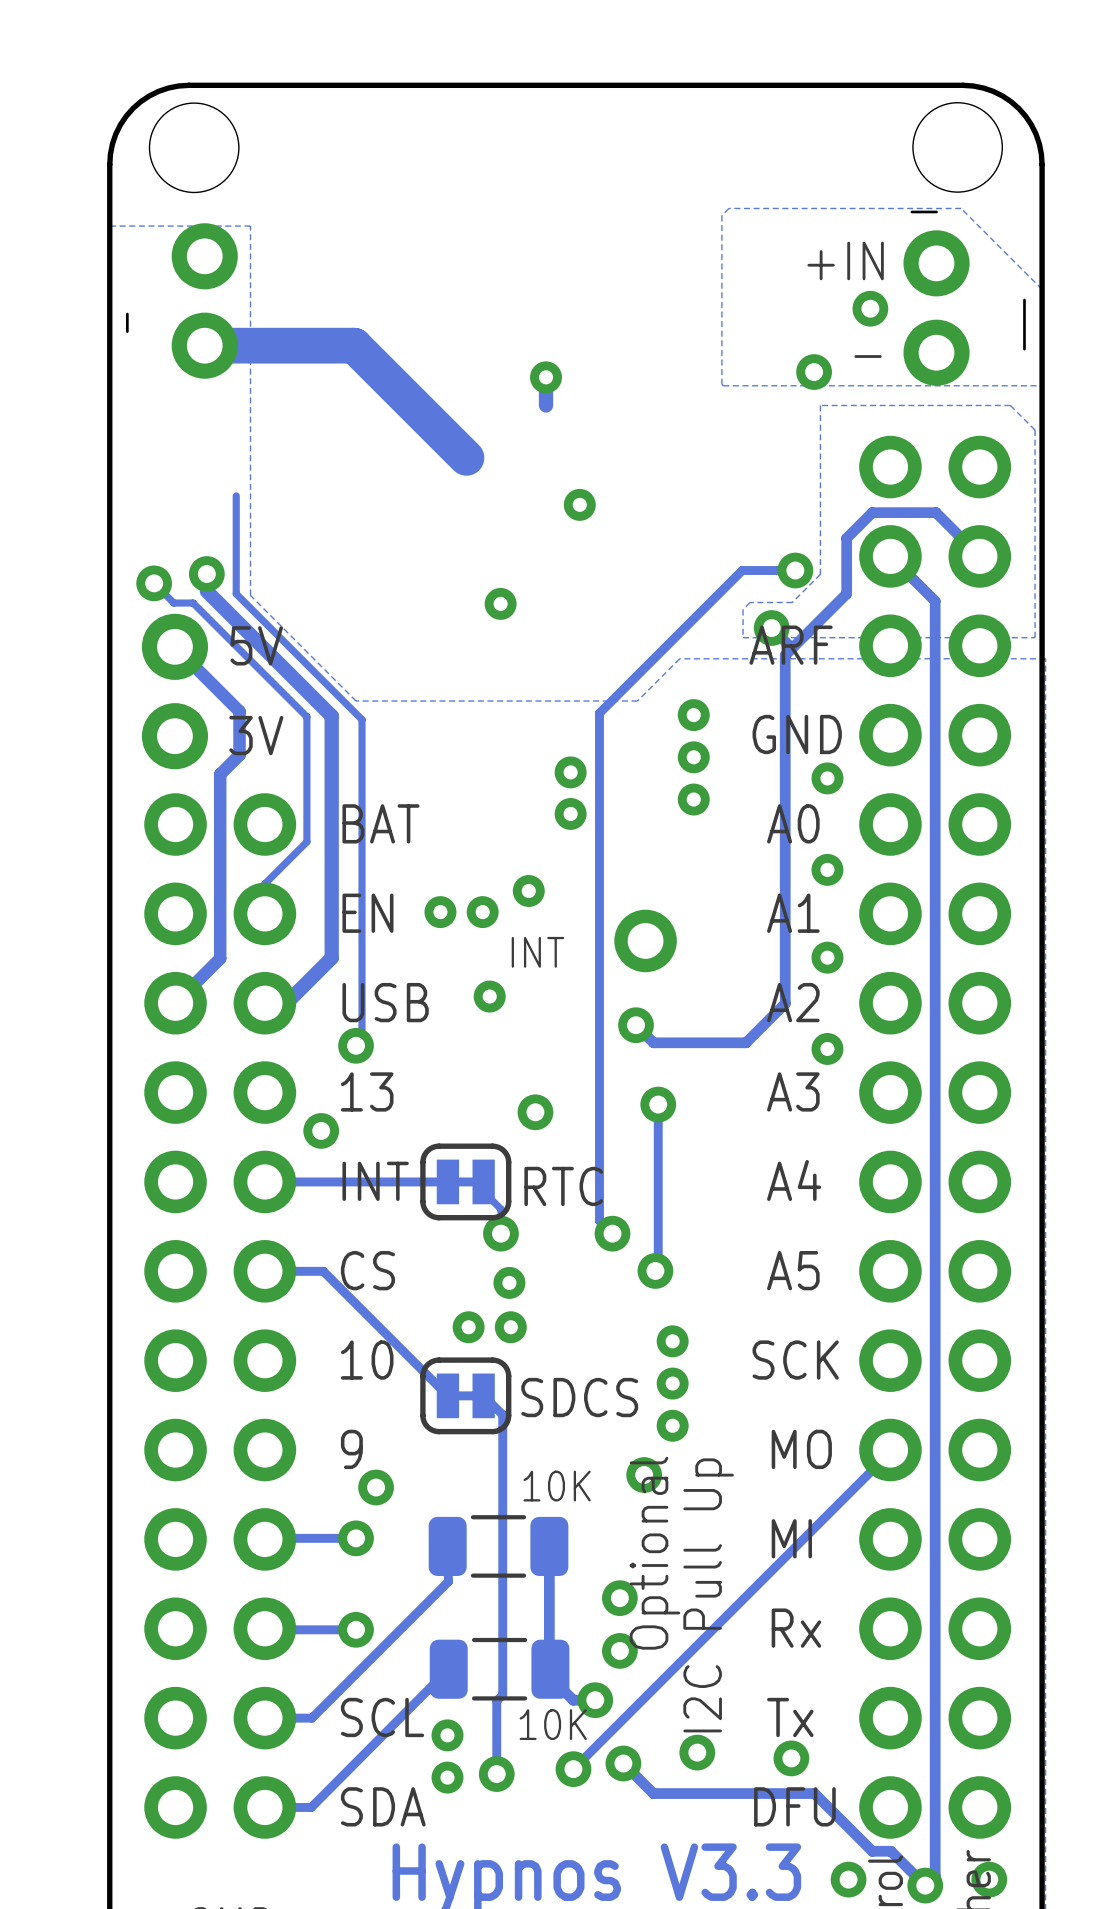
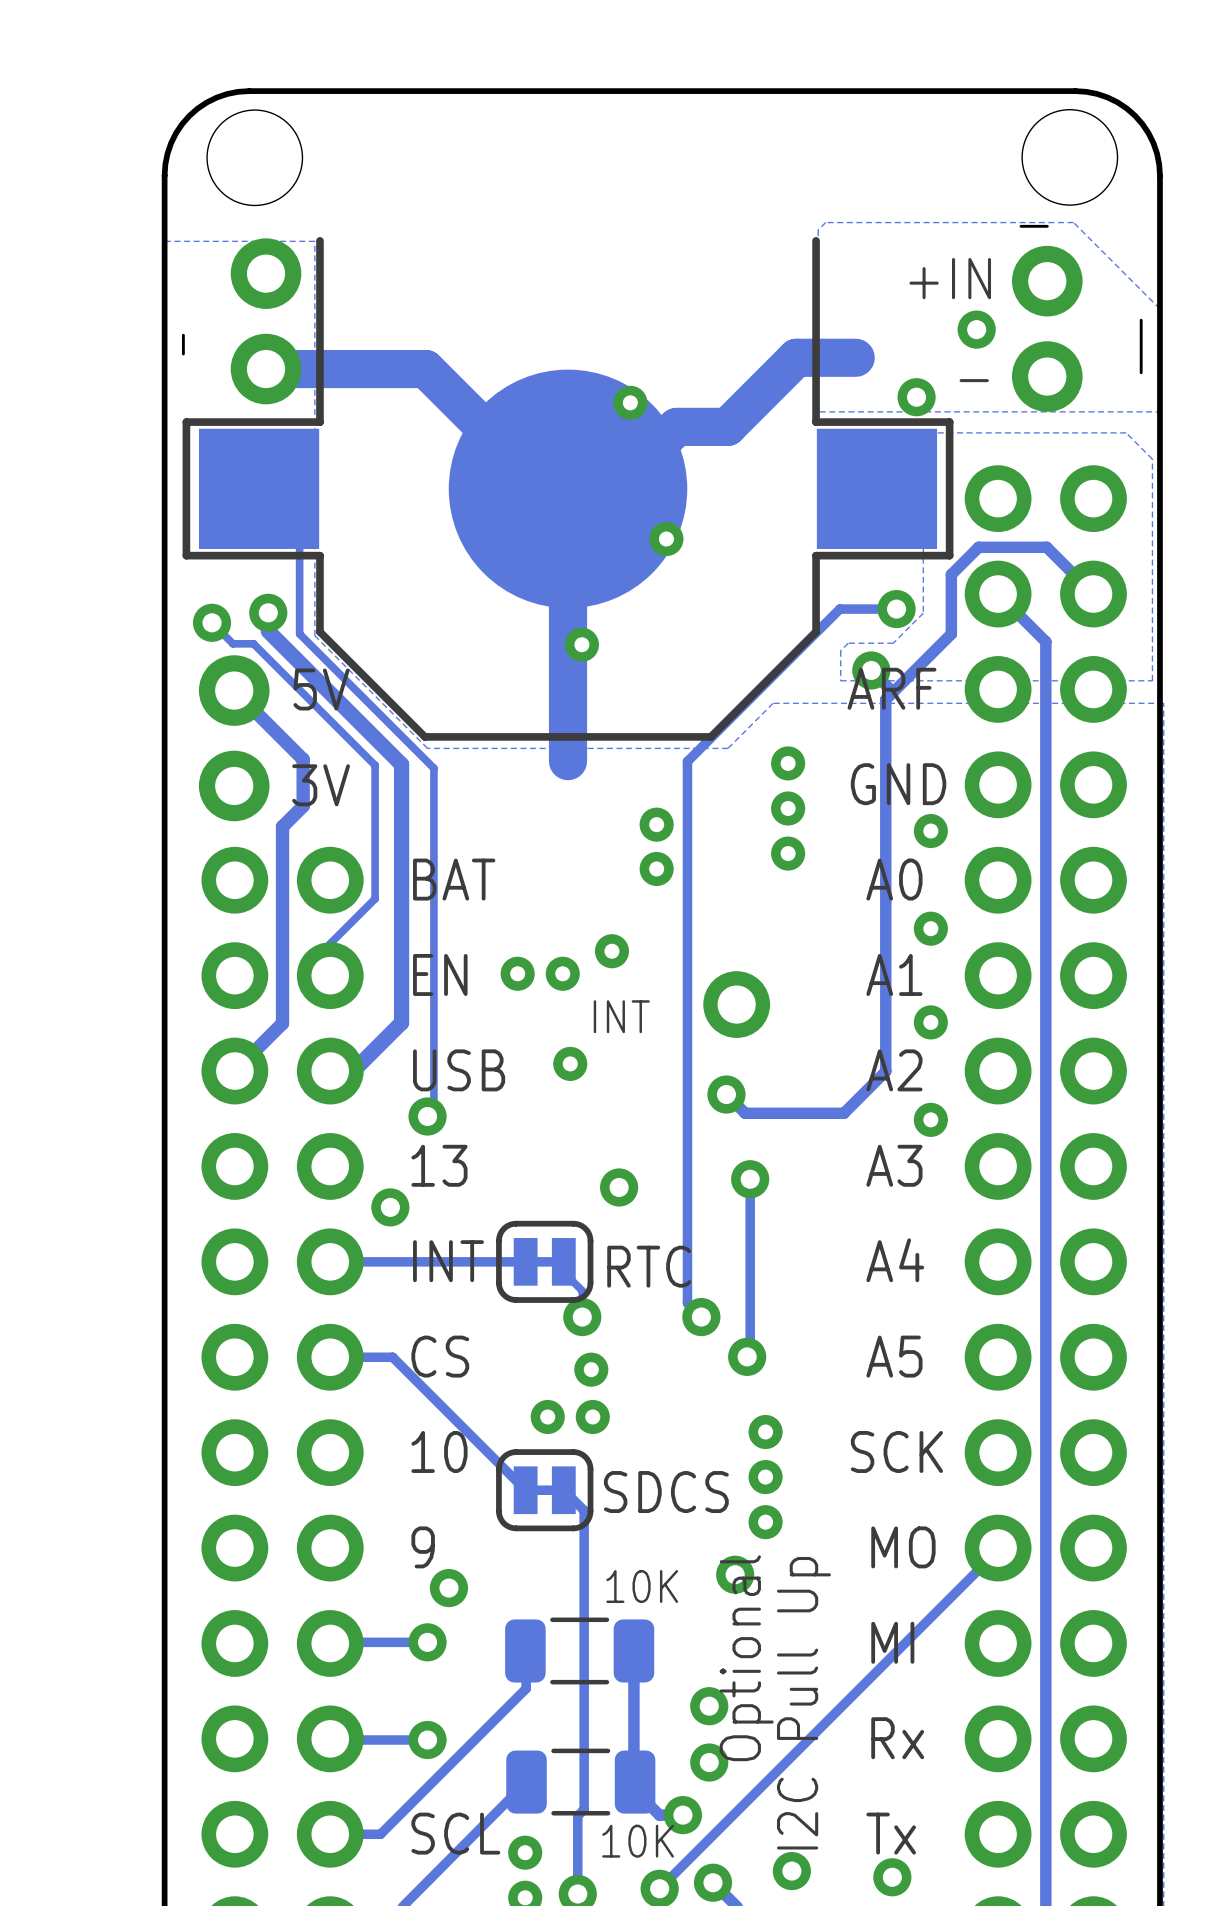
track: none -> (855, 357) (796, 357) (727, 426) (676, 426) (654, 449) (646, 441) (614, 441) (568, 488)
track: none -> (568, 488) (568, 761)
part: none -> (568, 488)

